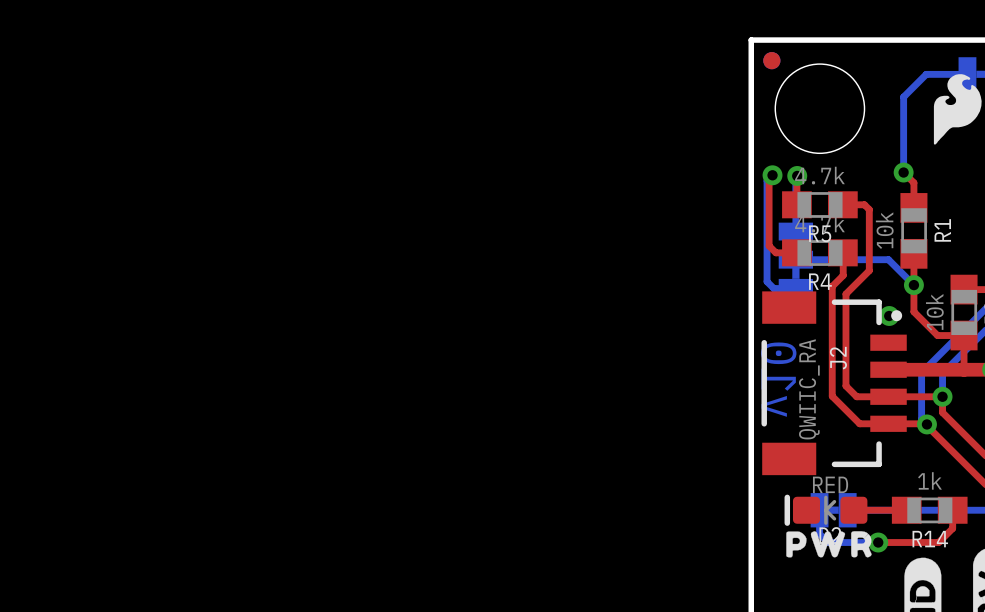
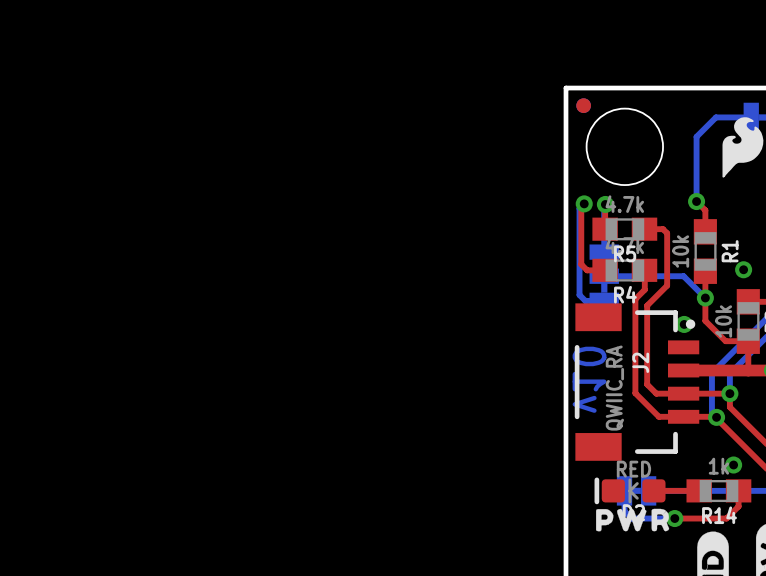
via: none -> (743, 269)
via: none -> (733, 465)

